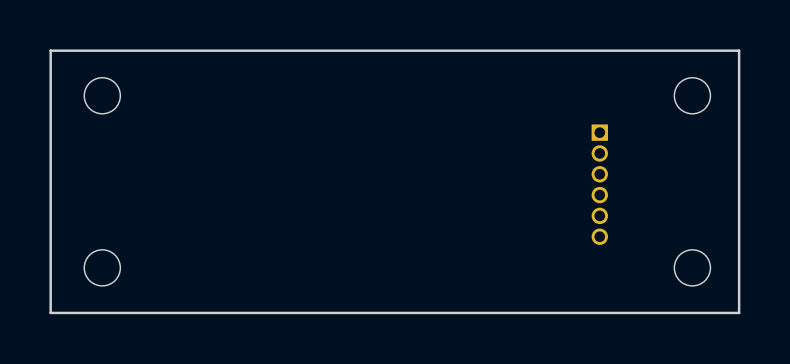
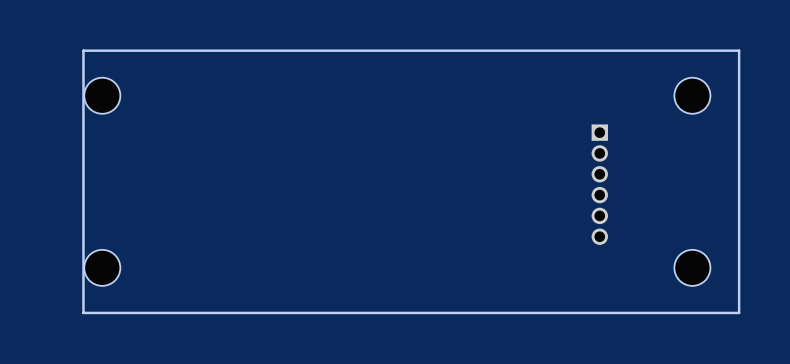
board edge: (83, 50) (50, 50) (50, 312) (83, 312) -> (83, 50) (83, 312)

